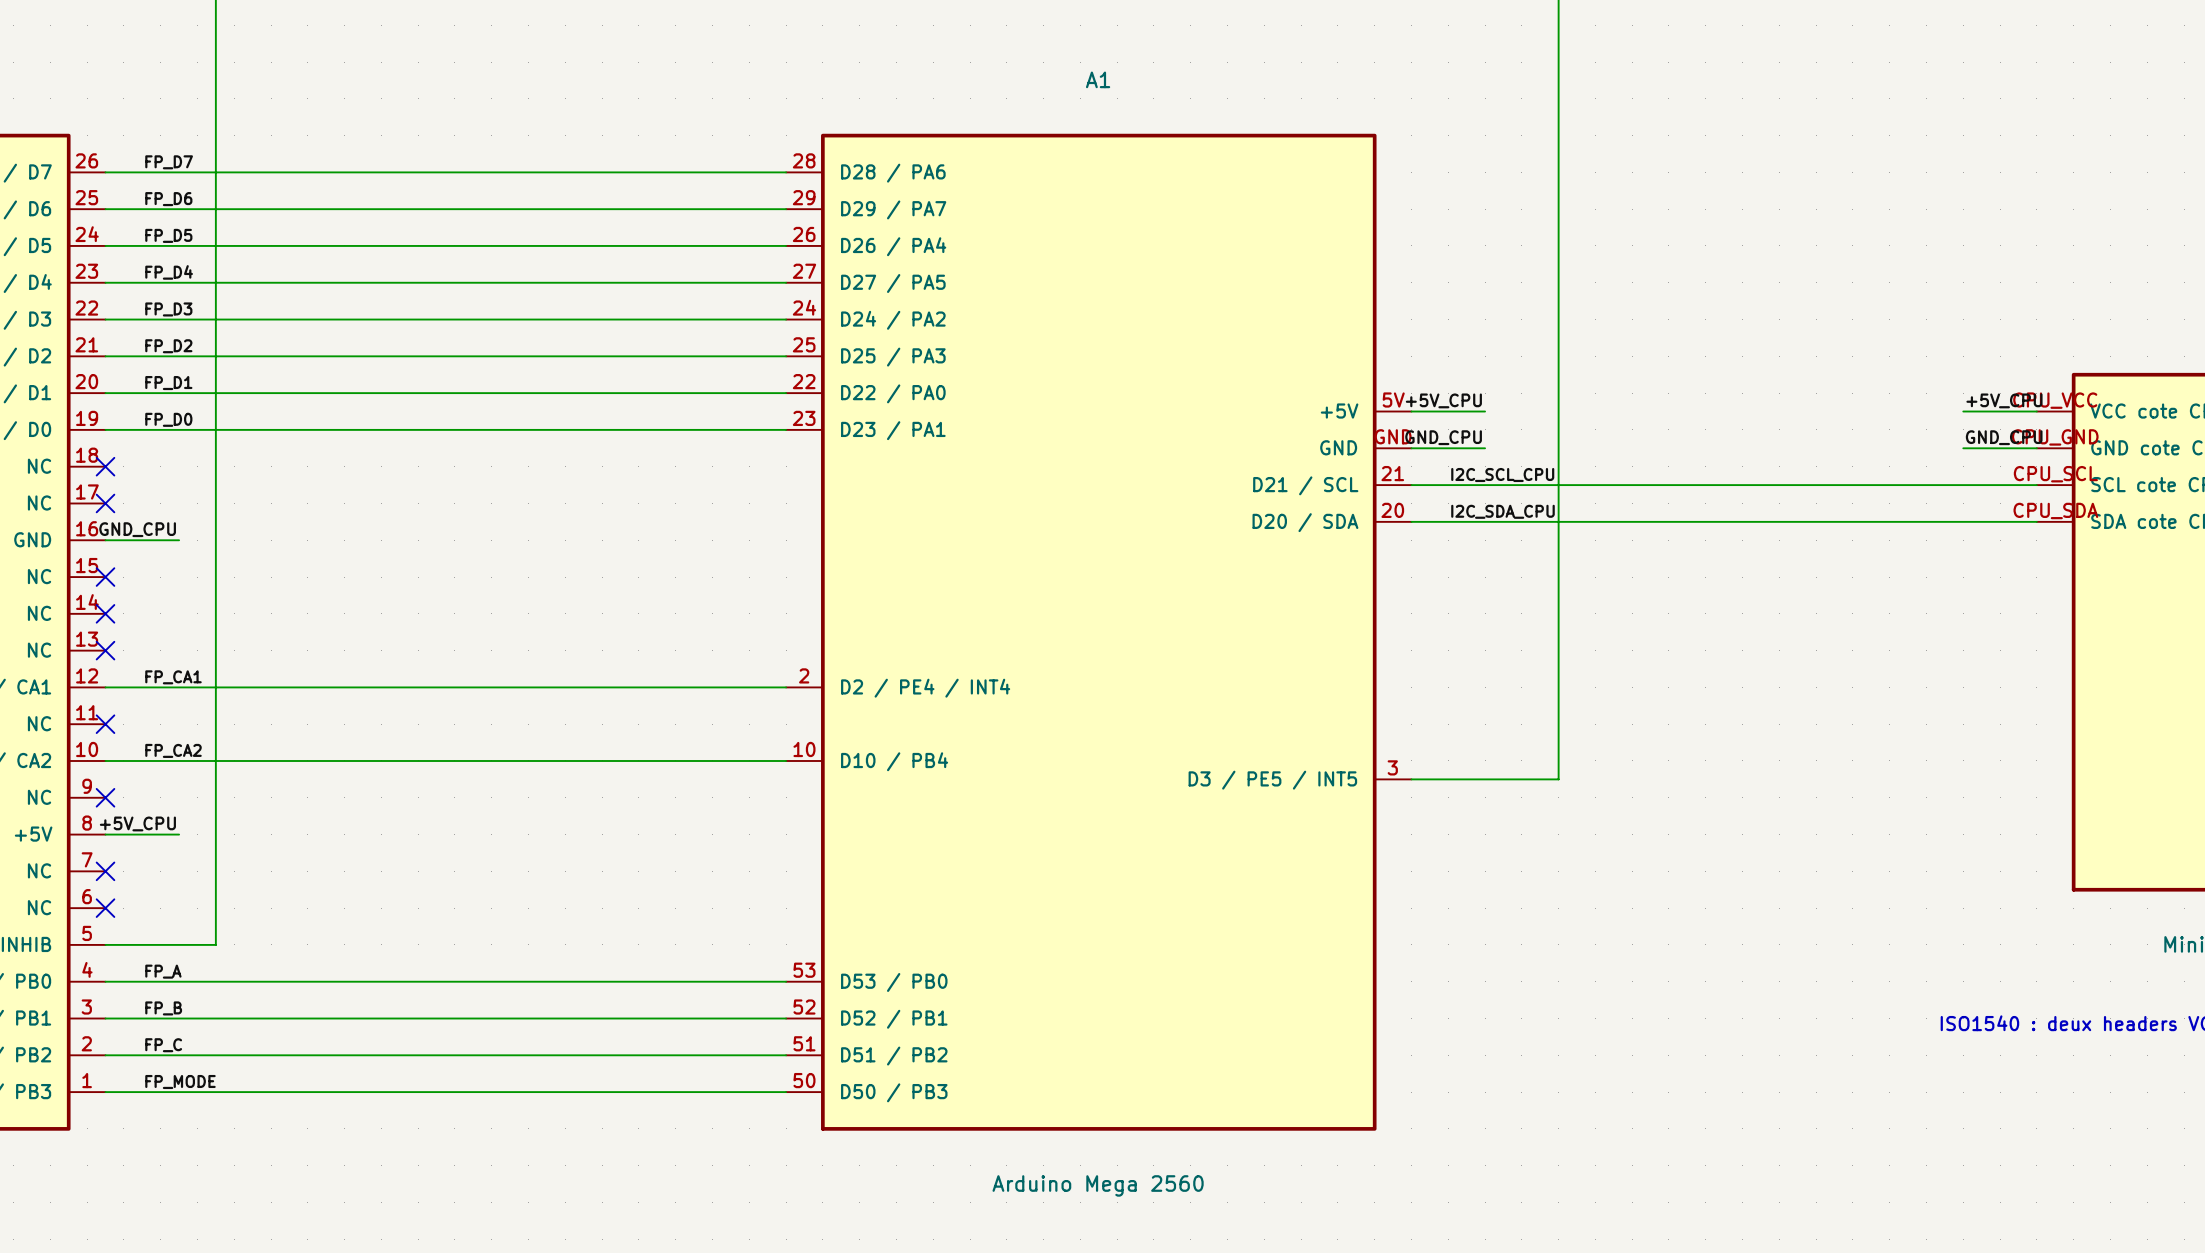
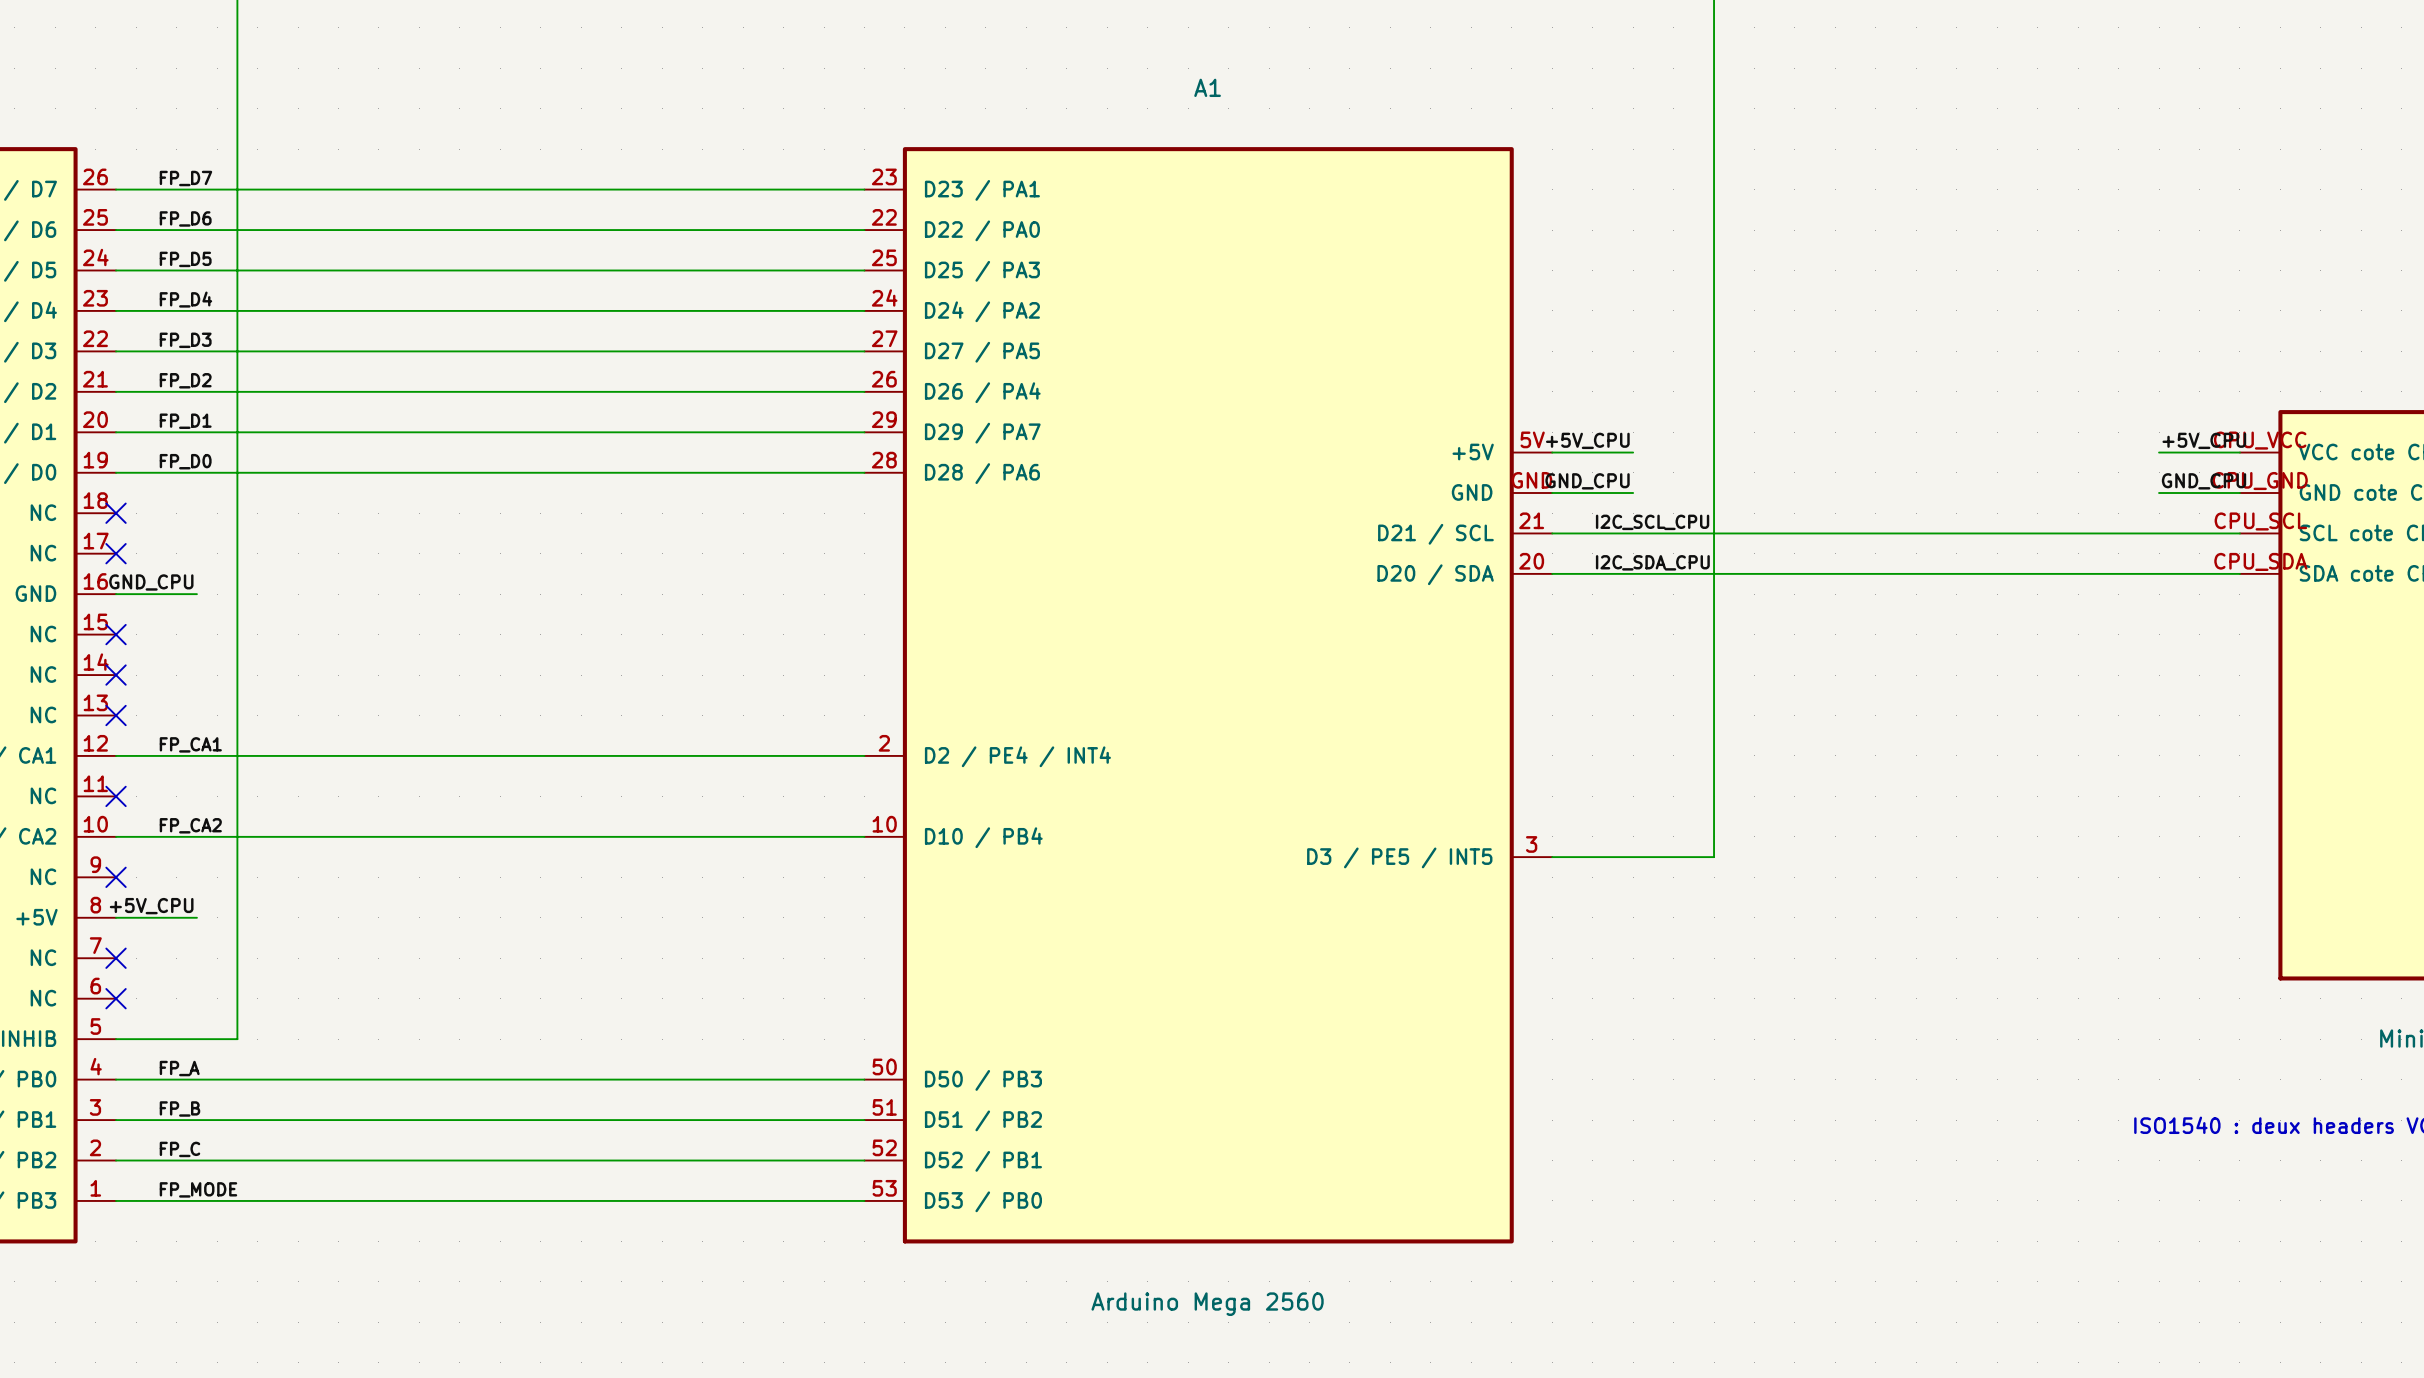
A1 symbol: [786, 133, 1412, 1131] -> [864, 147, 1553, 1244]

